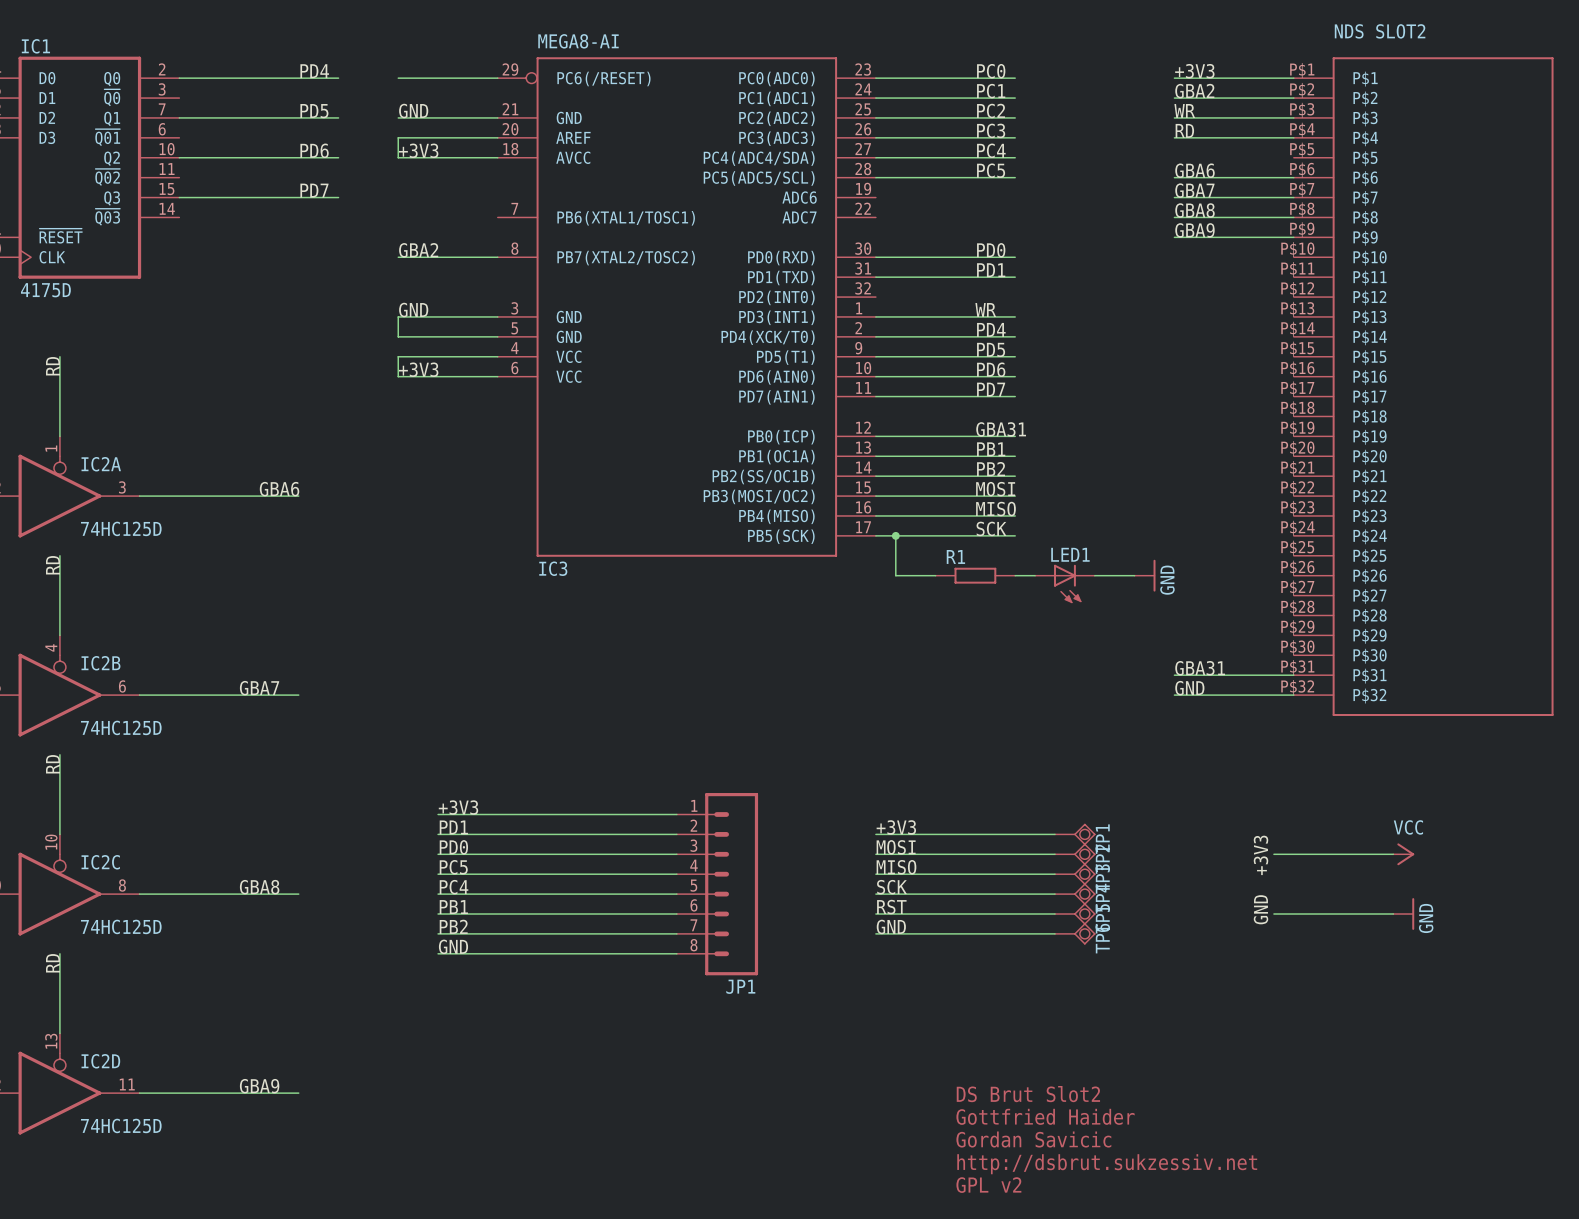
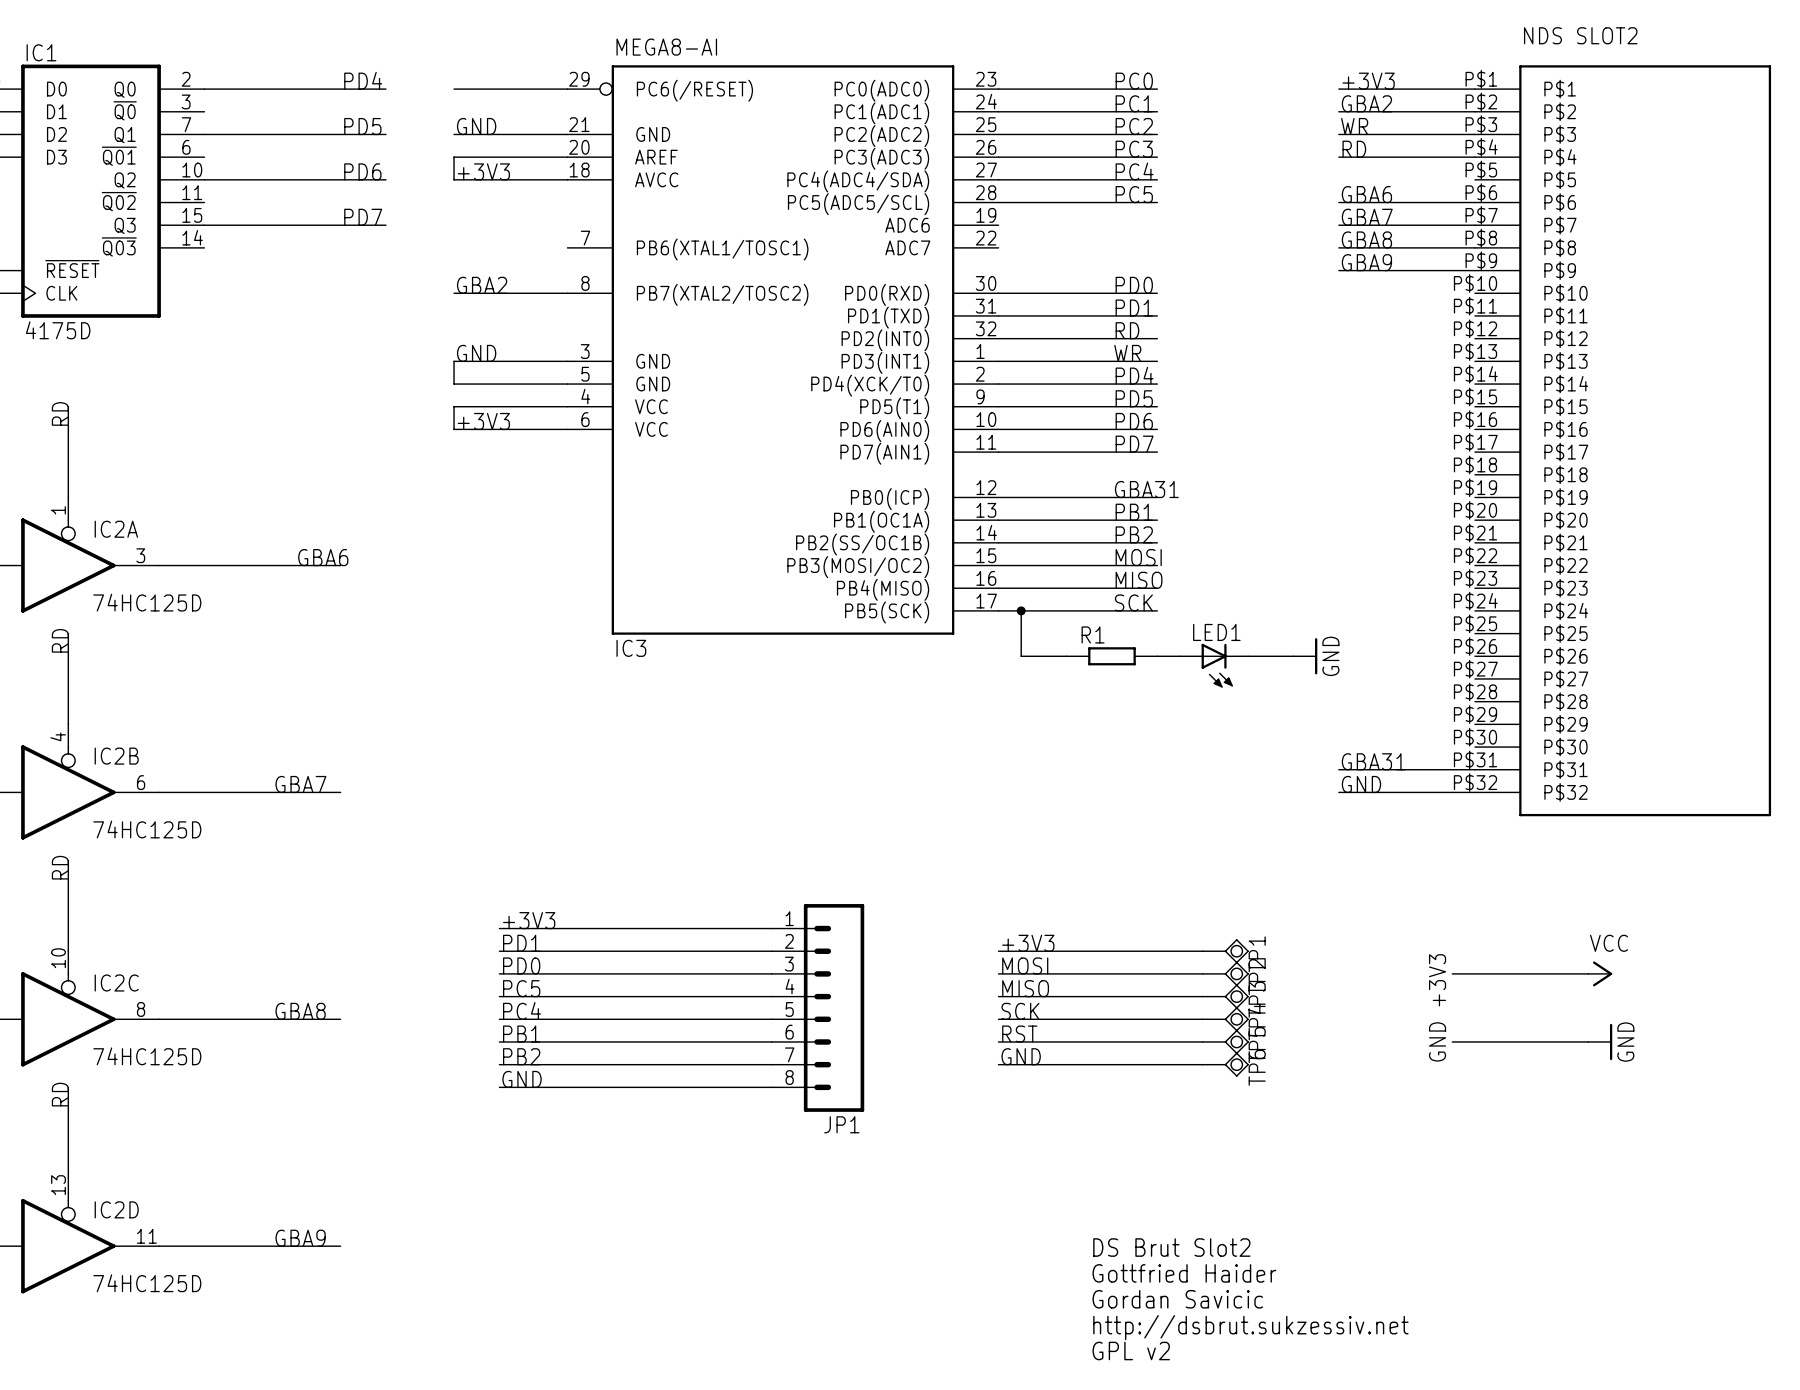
label: none -> RD (1127, 330)
wire: none -> (998, 338) (1157, 338)

